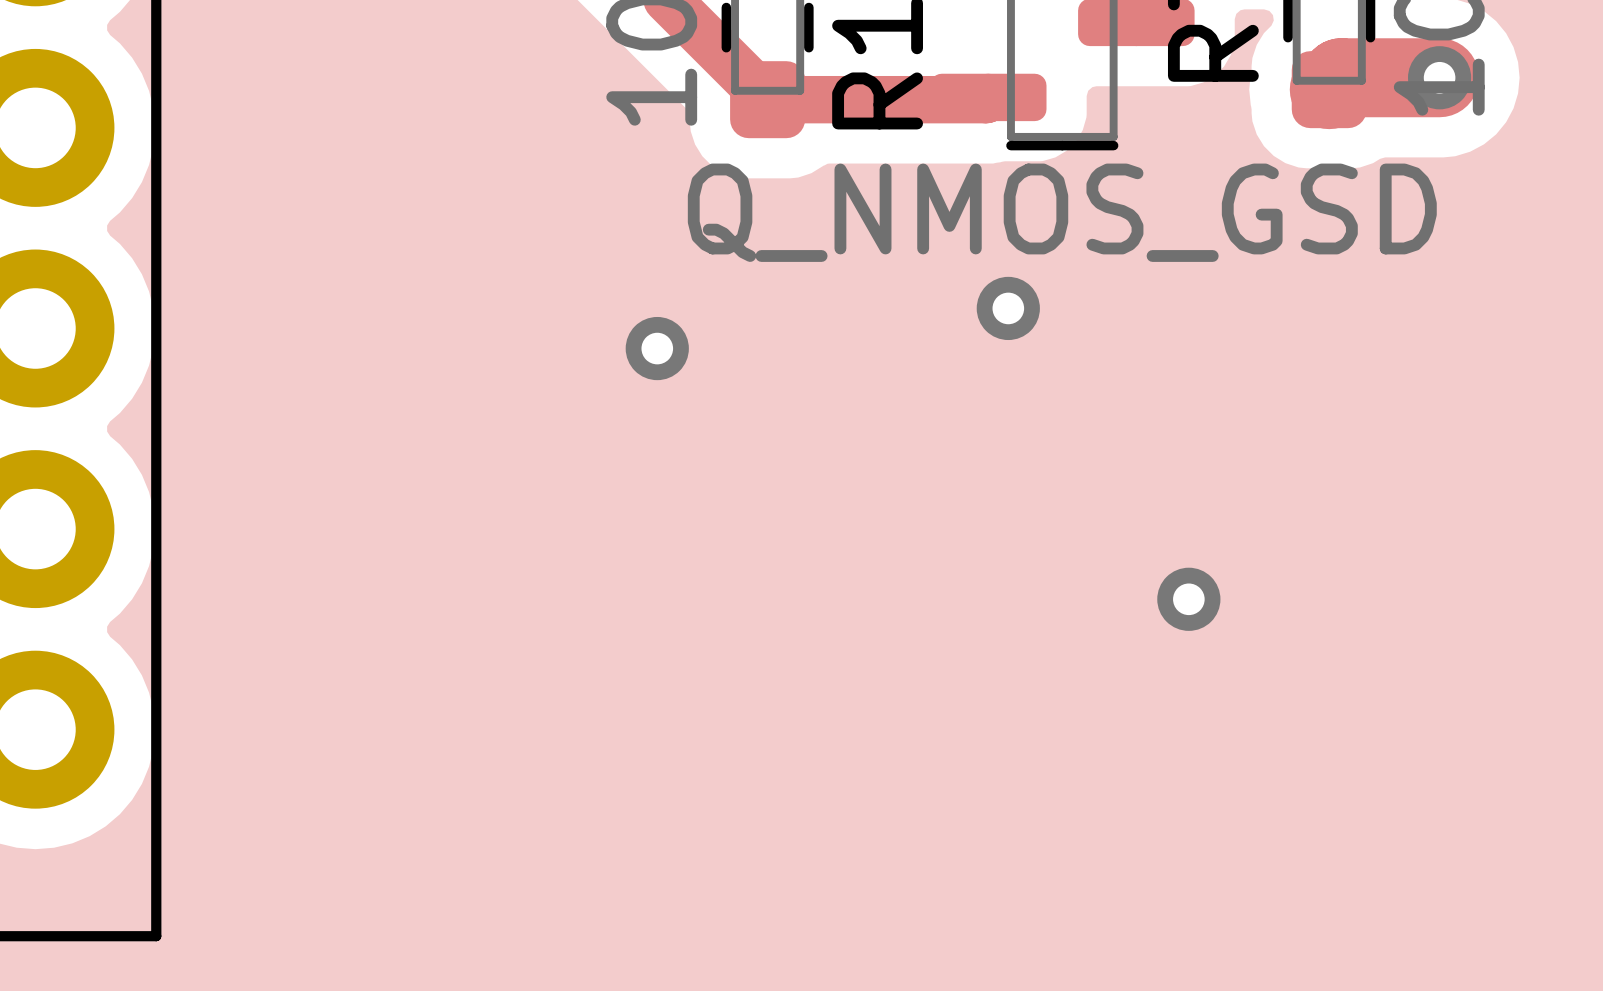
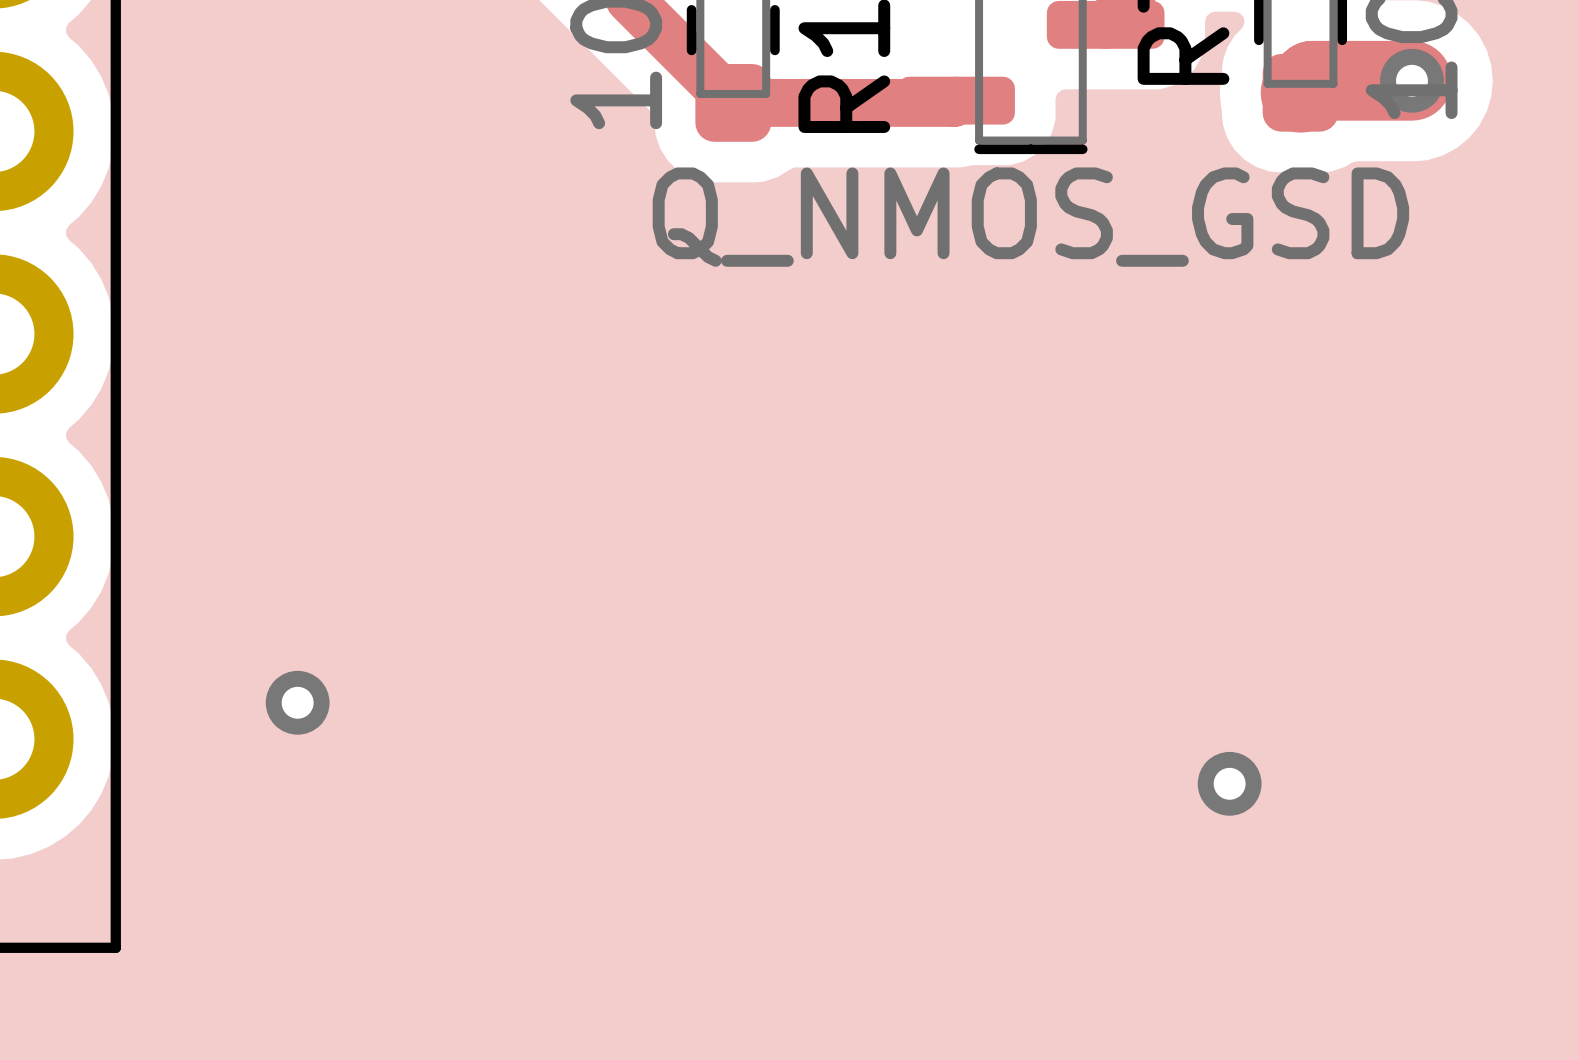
via: (1008, 308) -> none
via: (657, 348) -> none
via position: (1188, 599) -> (1229, 783)
via: none -> (297, 702)

